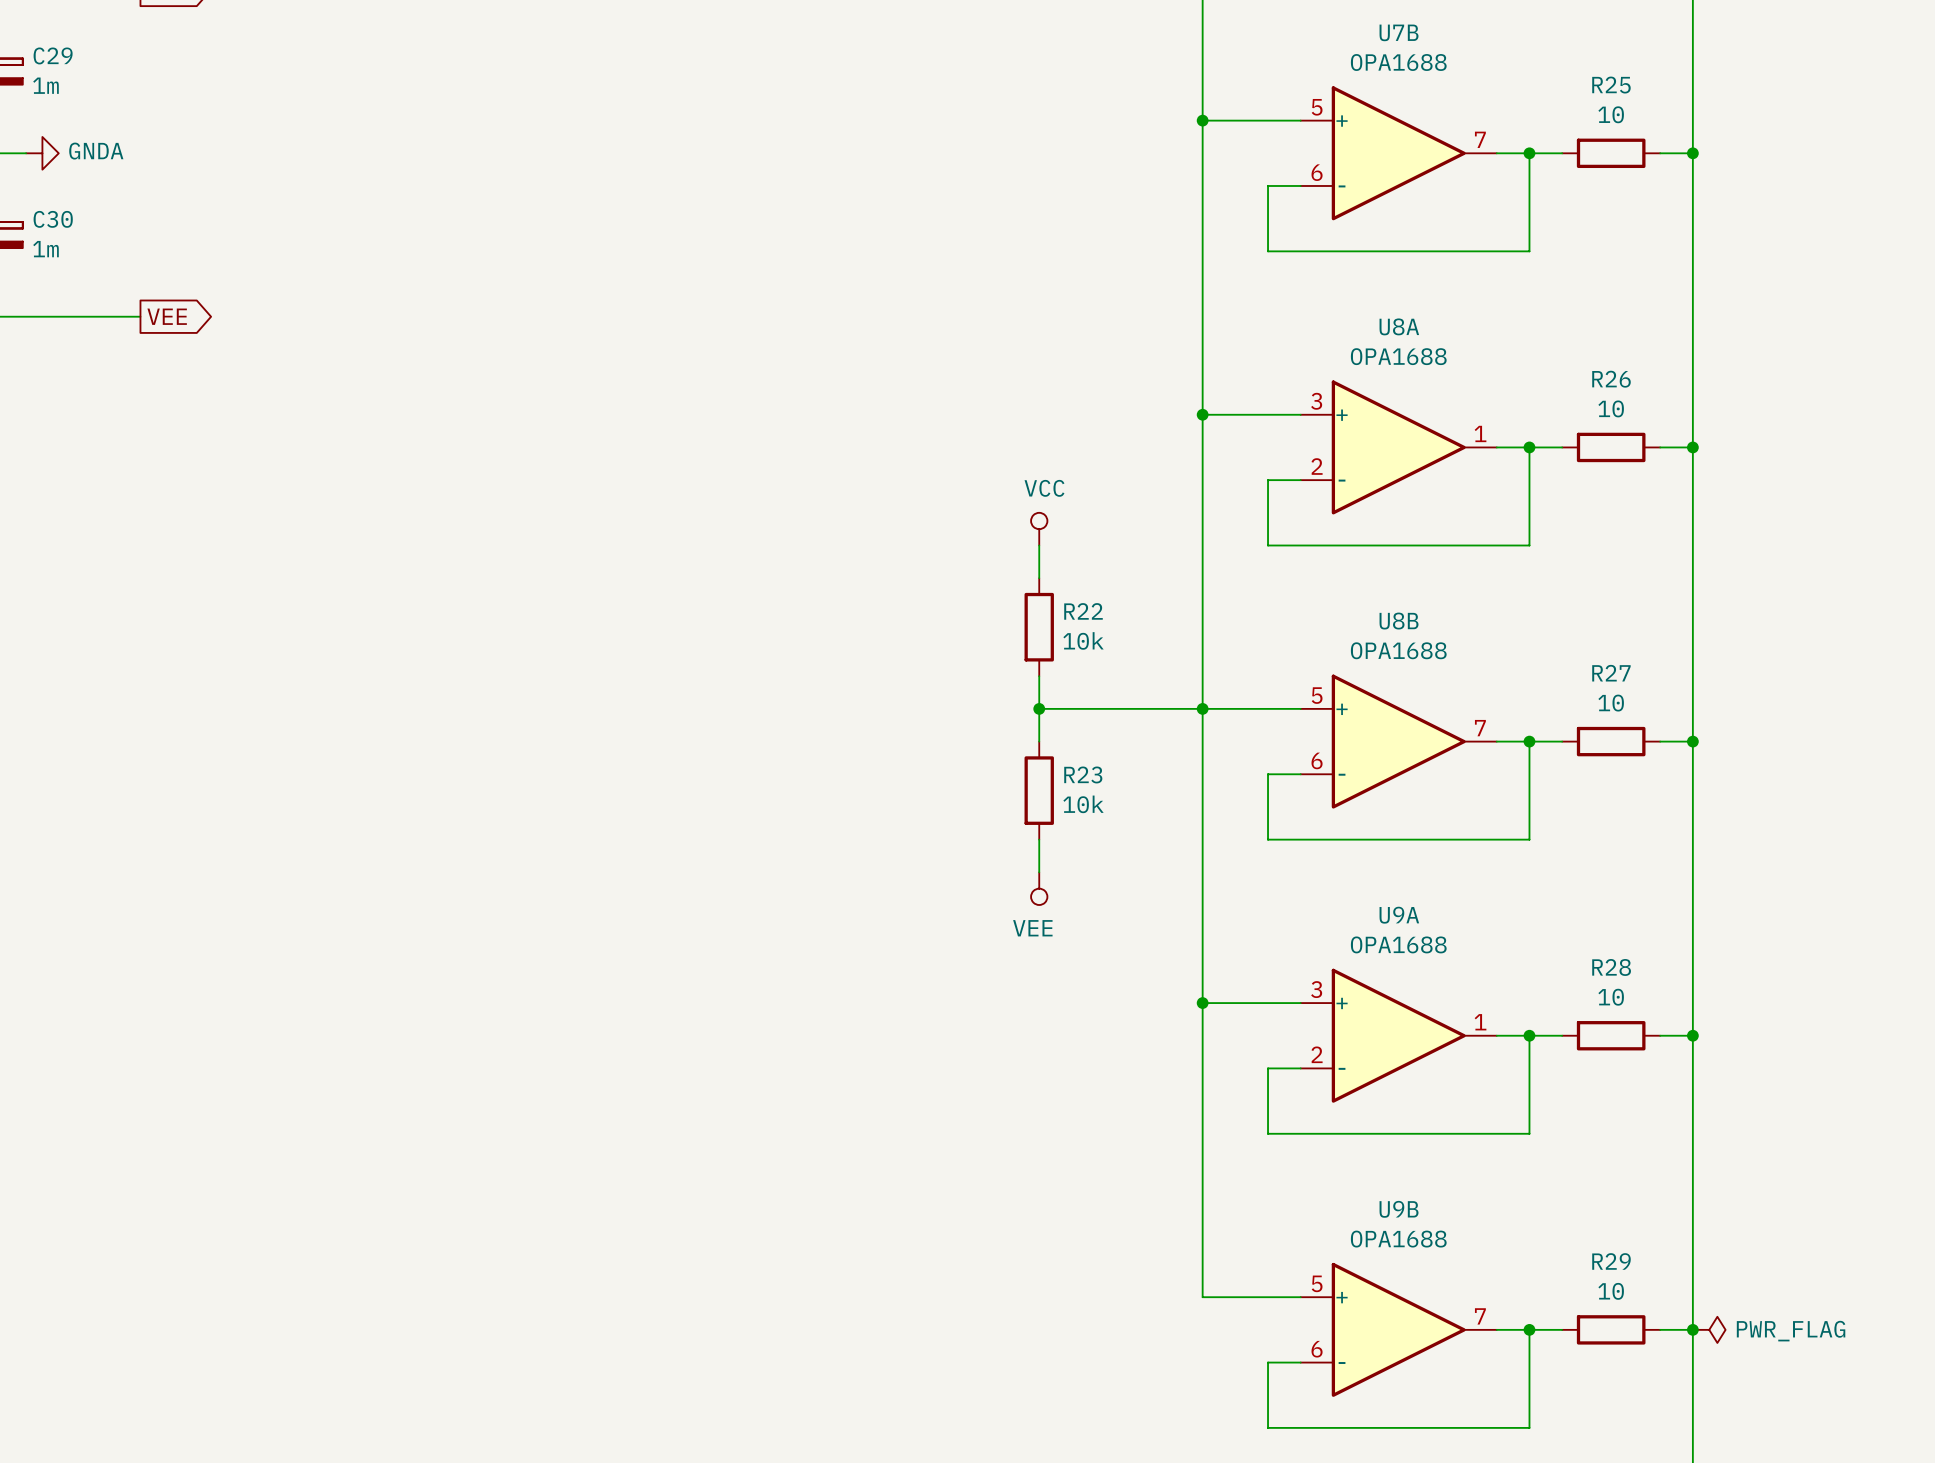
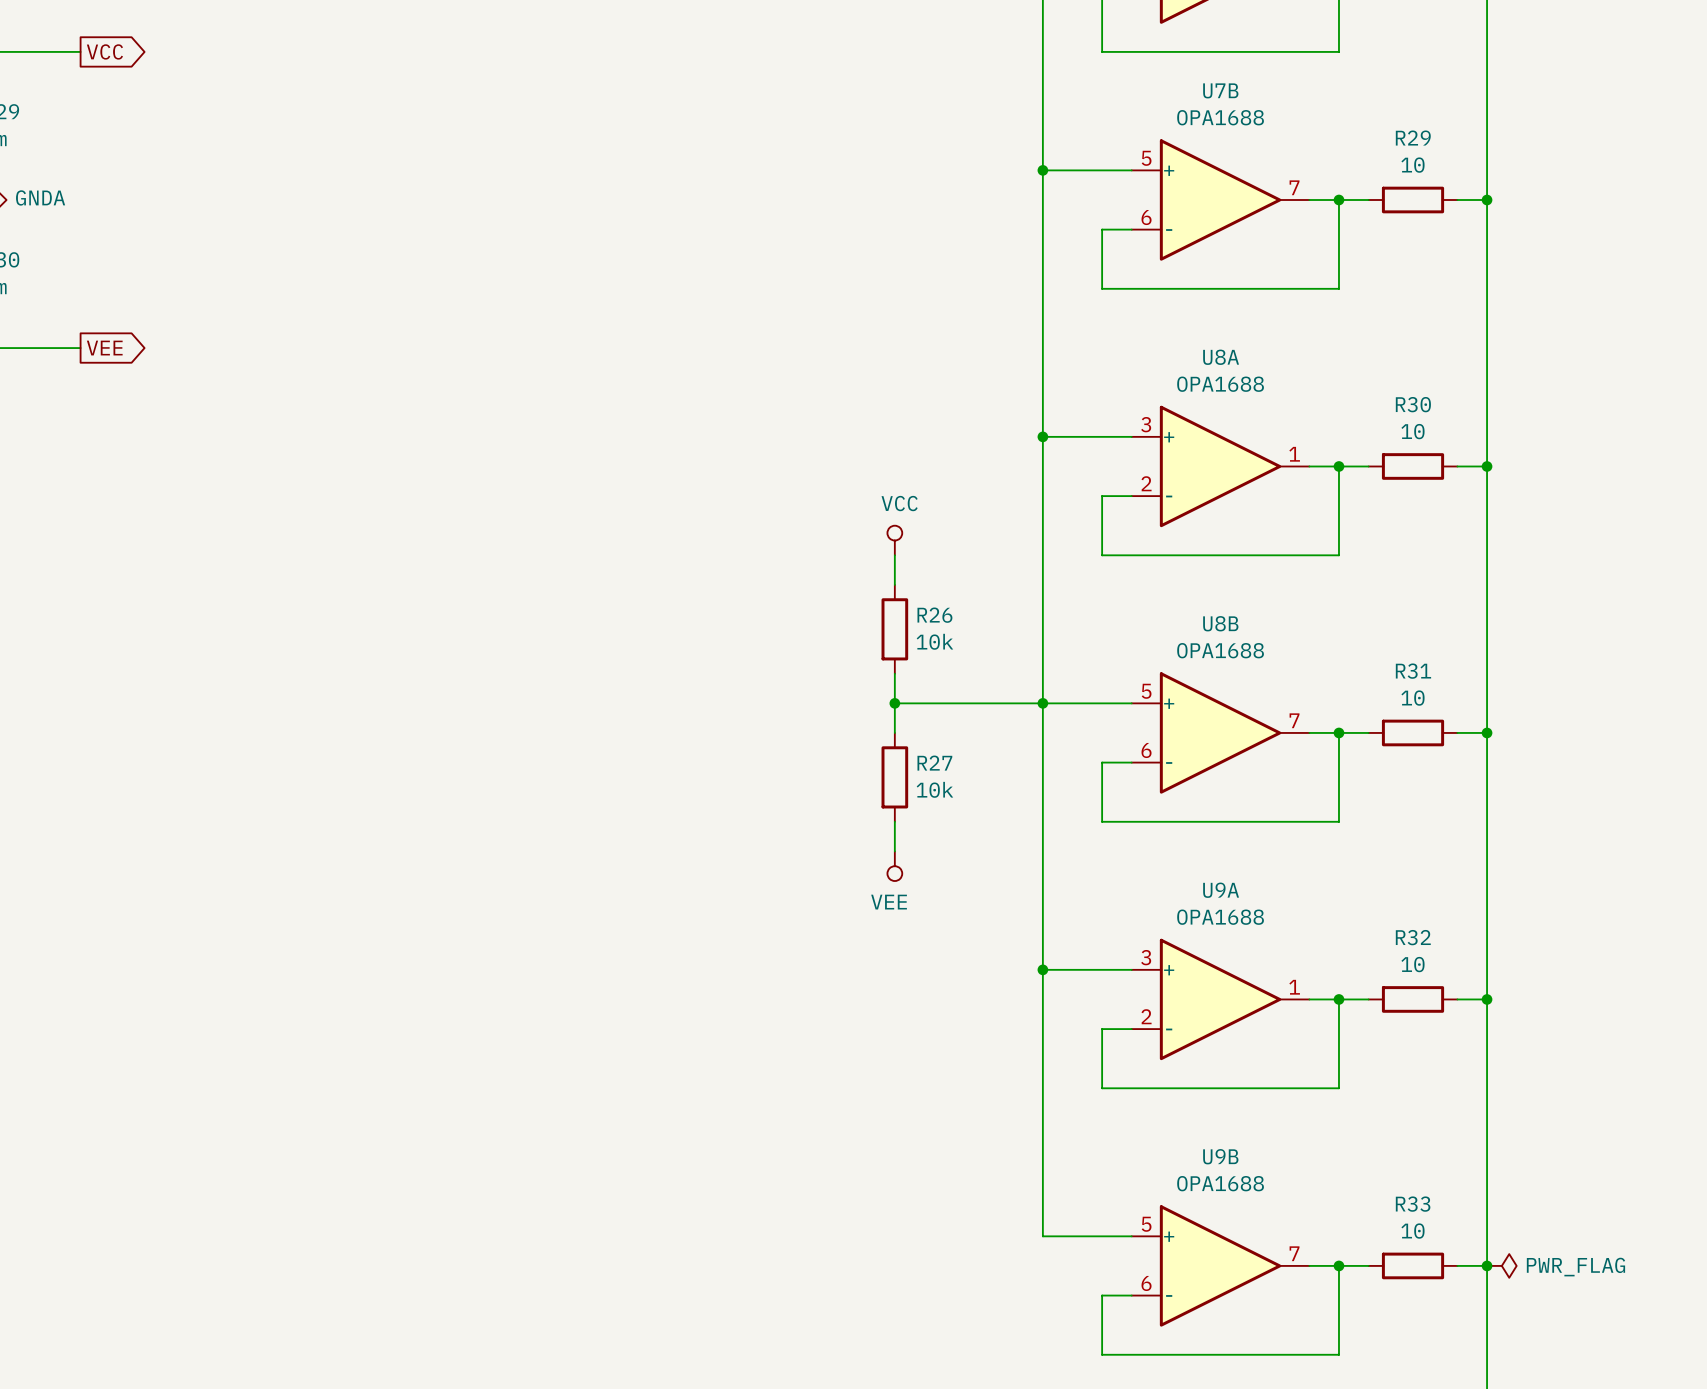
R25 name: R25 (1611, 85) -> R29 (1413, 138)
R26 name: R26 (1611, 379) -> R30 (1413, 404)
R22 name: R22 (1083, 611) -> R26 (934, 615)
R27 name: R27 (1611, 673) -> R31 (1413, 671)
R23 name: R23 (1083, 774) -> R27 (934, 763)
R28 name: R28 (1611, 967) -> R32 (1413, 937)
R29 name: R29 (1611, 1261) -> R33 (1413, 1204)

